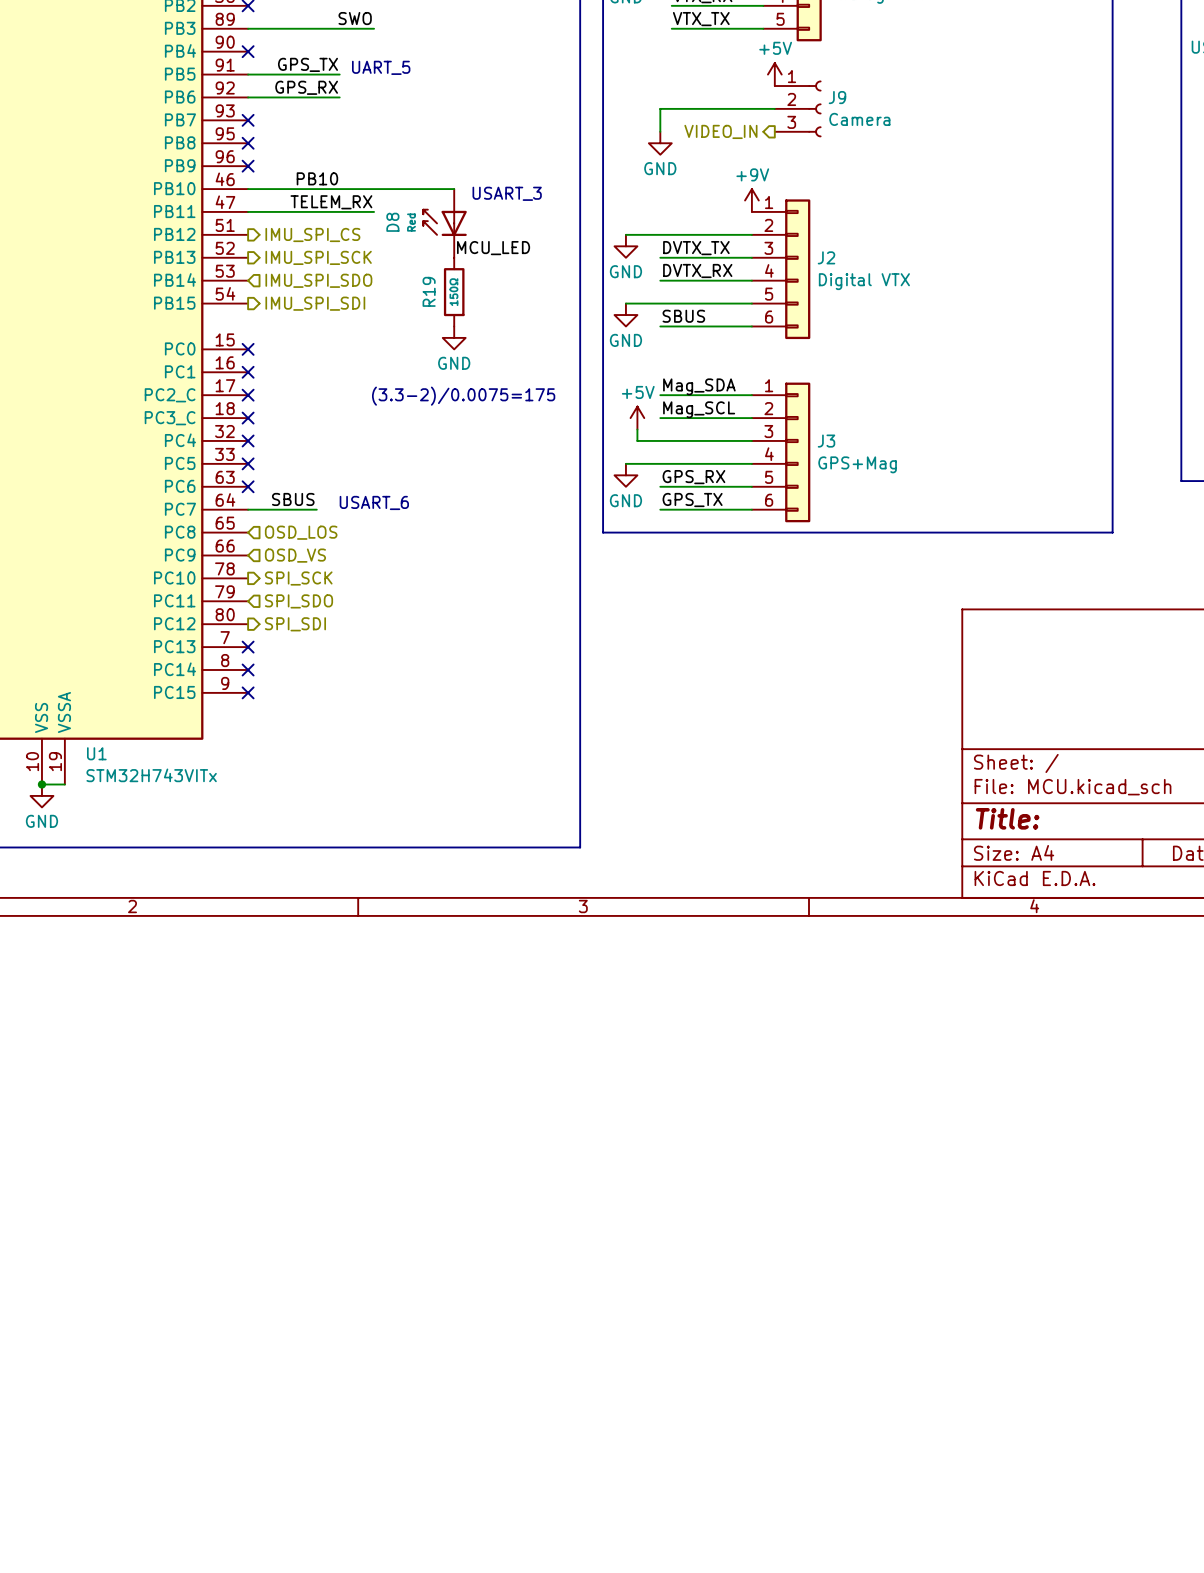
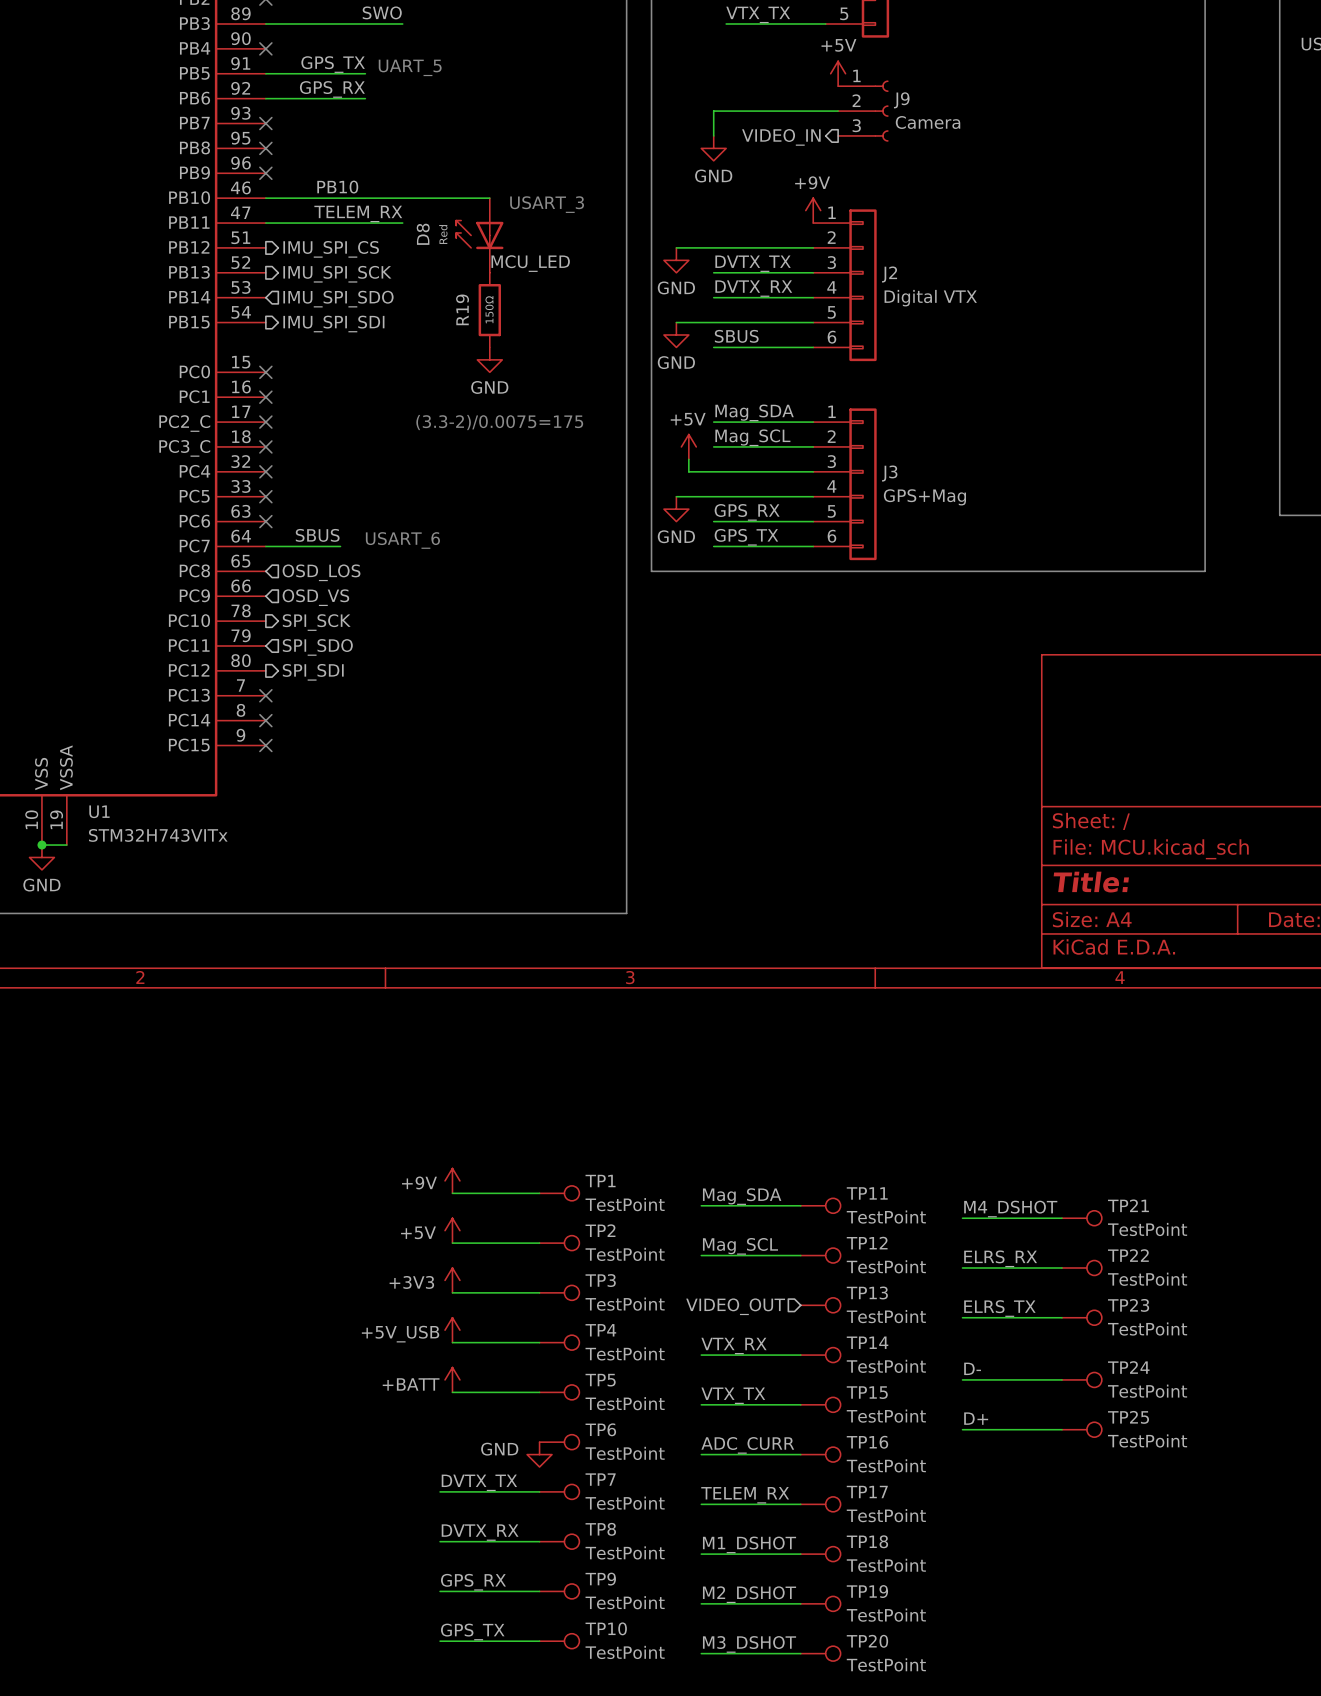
power symbol: none -> +9V (452, 1180)
wire: none -> (452, 1193) (539, 1193)
TP1: none -> TestPoint (559, 1193)
label: none -> Mag_SDA (742, 1196)
wire: none -> (701, 1205) (800, 1205)
TP11: none -> TestPoint (820, 1205)
label: none -> M4_DSHOT (1010, 1209)
wire: none -> (962, 1218) (1062, 1218)
TP21: none -> TestPoint (1081, 1218)
power symbol: none -> +5V (452, 1230)
wire: none -> (452, 1243) (539, 1243)
TP2: none -> TestPoint (559, 1243)
label: none -> Mag_SCL (740, 1246)
wire: none -> (701, 1255) (800, 1255)
TP12: none -> TestPoint (820, 1255)
label: none -> ELRS_RX (1000, 1258)
wire: none -> (962, 1267) (1062, 1267)
TP22: none -> TestPoint (1081, 1267)
power symbol: none -> +3V3 (452, 1280)
wire: none -> (452, 1292) (539, 1292)
TP3: none -> TestPoint (559, 1292)
hierarchical label: none -> VIDEO_OUT (735, 1306)
TP13: none -> TestPoint (820, 1305)
label: none -> ELRS_TX (999, 1308)
wire: none -> (962, 1317) (1062, 1317)
TP23: none -> TestPoint (1081, 1317)
power symbol: none -> +5V_USB (452, 1330)
wire: none -> (452, 1342) (539, 1342)
TP4: none -> TestPoint (559, 1342)
label: none -> VTX_RX (734, 1345)
wire: none -> (701, 1355) (800, 1355)
TP14: none -> TestPoint (820, 1355)
label: none -> D- (972, 1368)
power symbol: none -> +BATT (452, 1379)
wire: none -> (962, 1379) (1062, 1379)
TP24: none -> TestPoint (1081, 1379)
wire: none -> (452, 1392) (539, 1392)
TP5: none -> TestPoint (559, 1392)
label: none -> VTX_TX (733, 1395)
wire: none -> (701, 1404) (800, 1404)
TP15: none -> TestPoint (820, 1404)
label: none -> D+ (976, 1418)
wire: none -> (962, 1429) (1062, 1429)
TP25: none -> TestPoint (1081, 1429)
TP6: none -> TestPoint (559, 1442)
label: none -> ADC_CURR (747, 1445)
power symbol: none -> GND (539, 1454)
wire: none -> (701, 1454) (800, 1454)
TP16: none -> TestPoint (820, 1454)
label: none -> DVTX_TX (479, 1482)
wire: none -> (440, 1491) (539, 1491)
TP7: none -> TestPoint (559, 1491)
label: none -> TELEM_RX (745, 1495)
wire: none -> (701, 1504) (800, 1504)
TP17: none -> TestPoint (820, 1504)
label: none -> DVTX_RX (480, 1532)
wire: none -> (440, 1541) (539, 1541)
TP8: none -> TestPoint (559, 1541)
label: none -> M1_DSHOT (749, 1544)
wire: none -> (701, 1554) (800, 1554)
TP18: none -> TestPoint (820, 1554)
label: none -> GPS_RX (473, 1582)
wire: none -> (440, 1591) (539, 1591)
TP9: none -> TestPoint (559, 1591)
label: none -> M2_DSHOT (749, 1594)
wire: none -> (701, 1603) (800, 1603)
TP19: none -> TestPoint (820, 1603)
label: none -> GPS_TX (472, 1631)
wire: none -> (440, 1641) (539, 1641)
TP10: none -> TestPoint (559, 1641)
label: none -> M3_DSHOT (749, 1644)
wire: none -> (701, 1653) (800, 1653)
TP20: none -> TestPoint (820, 1653)

